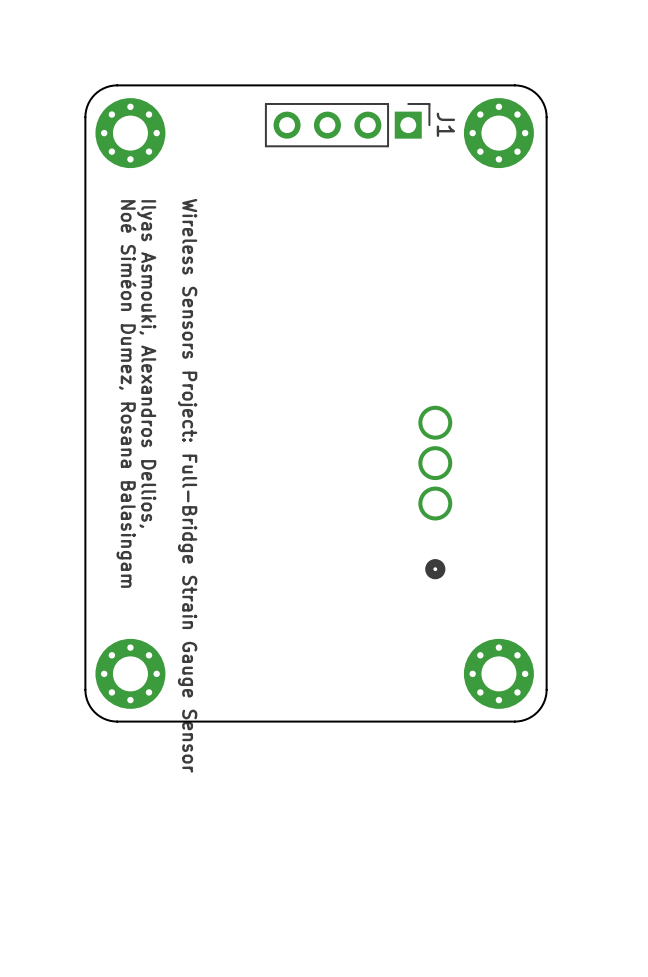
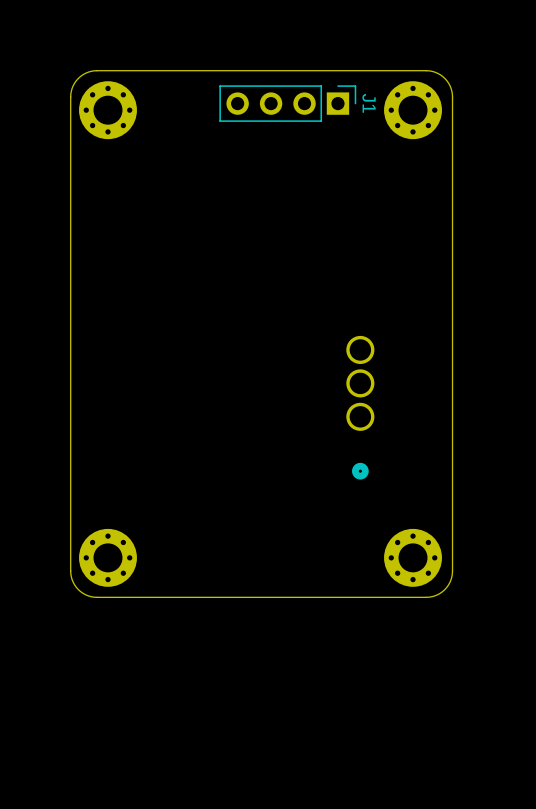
text: Ilyas Asmouki, Alexandros Dellios, (146, 364) -> none
text: Noé Siméon Dumez, Rosana Balasingam (126, 393) -> none
text: Wireless Sensors Project: Full-Bridge Strain Gauge Sensor (187, 485) -> none

